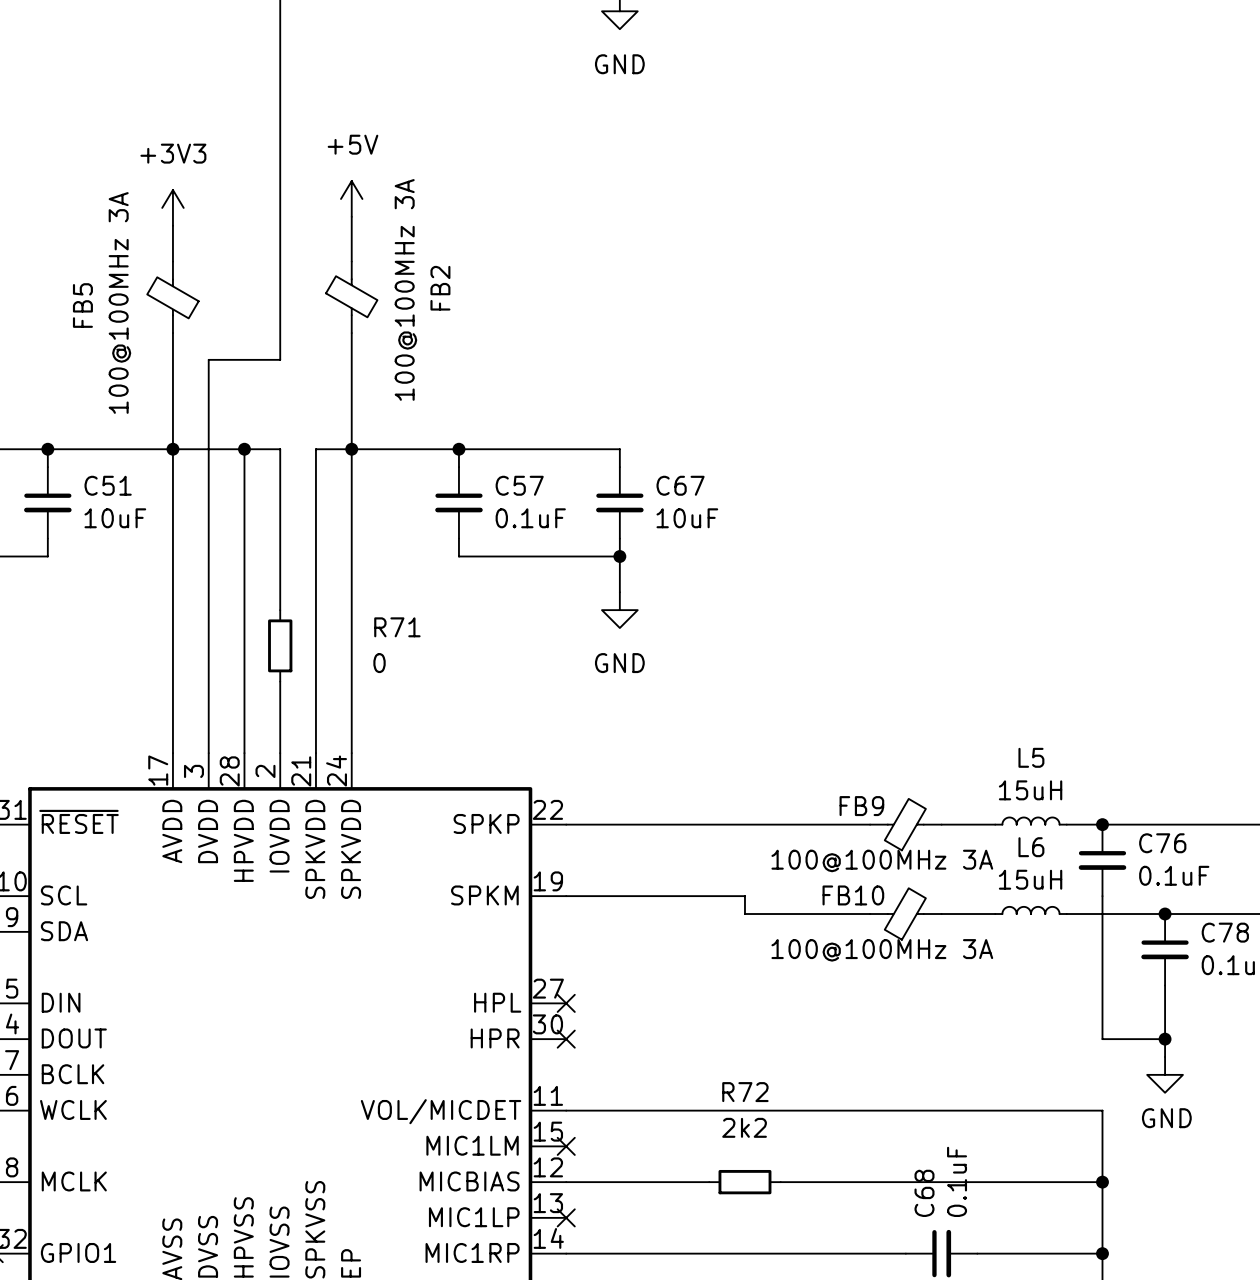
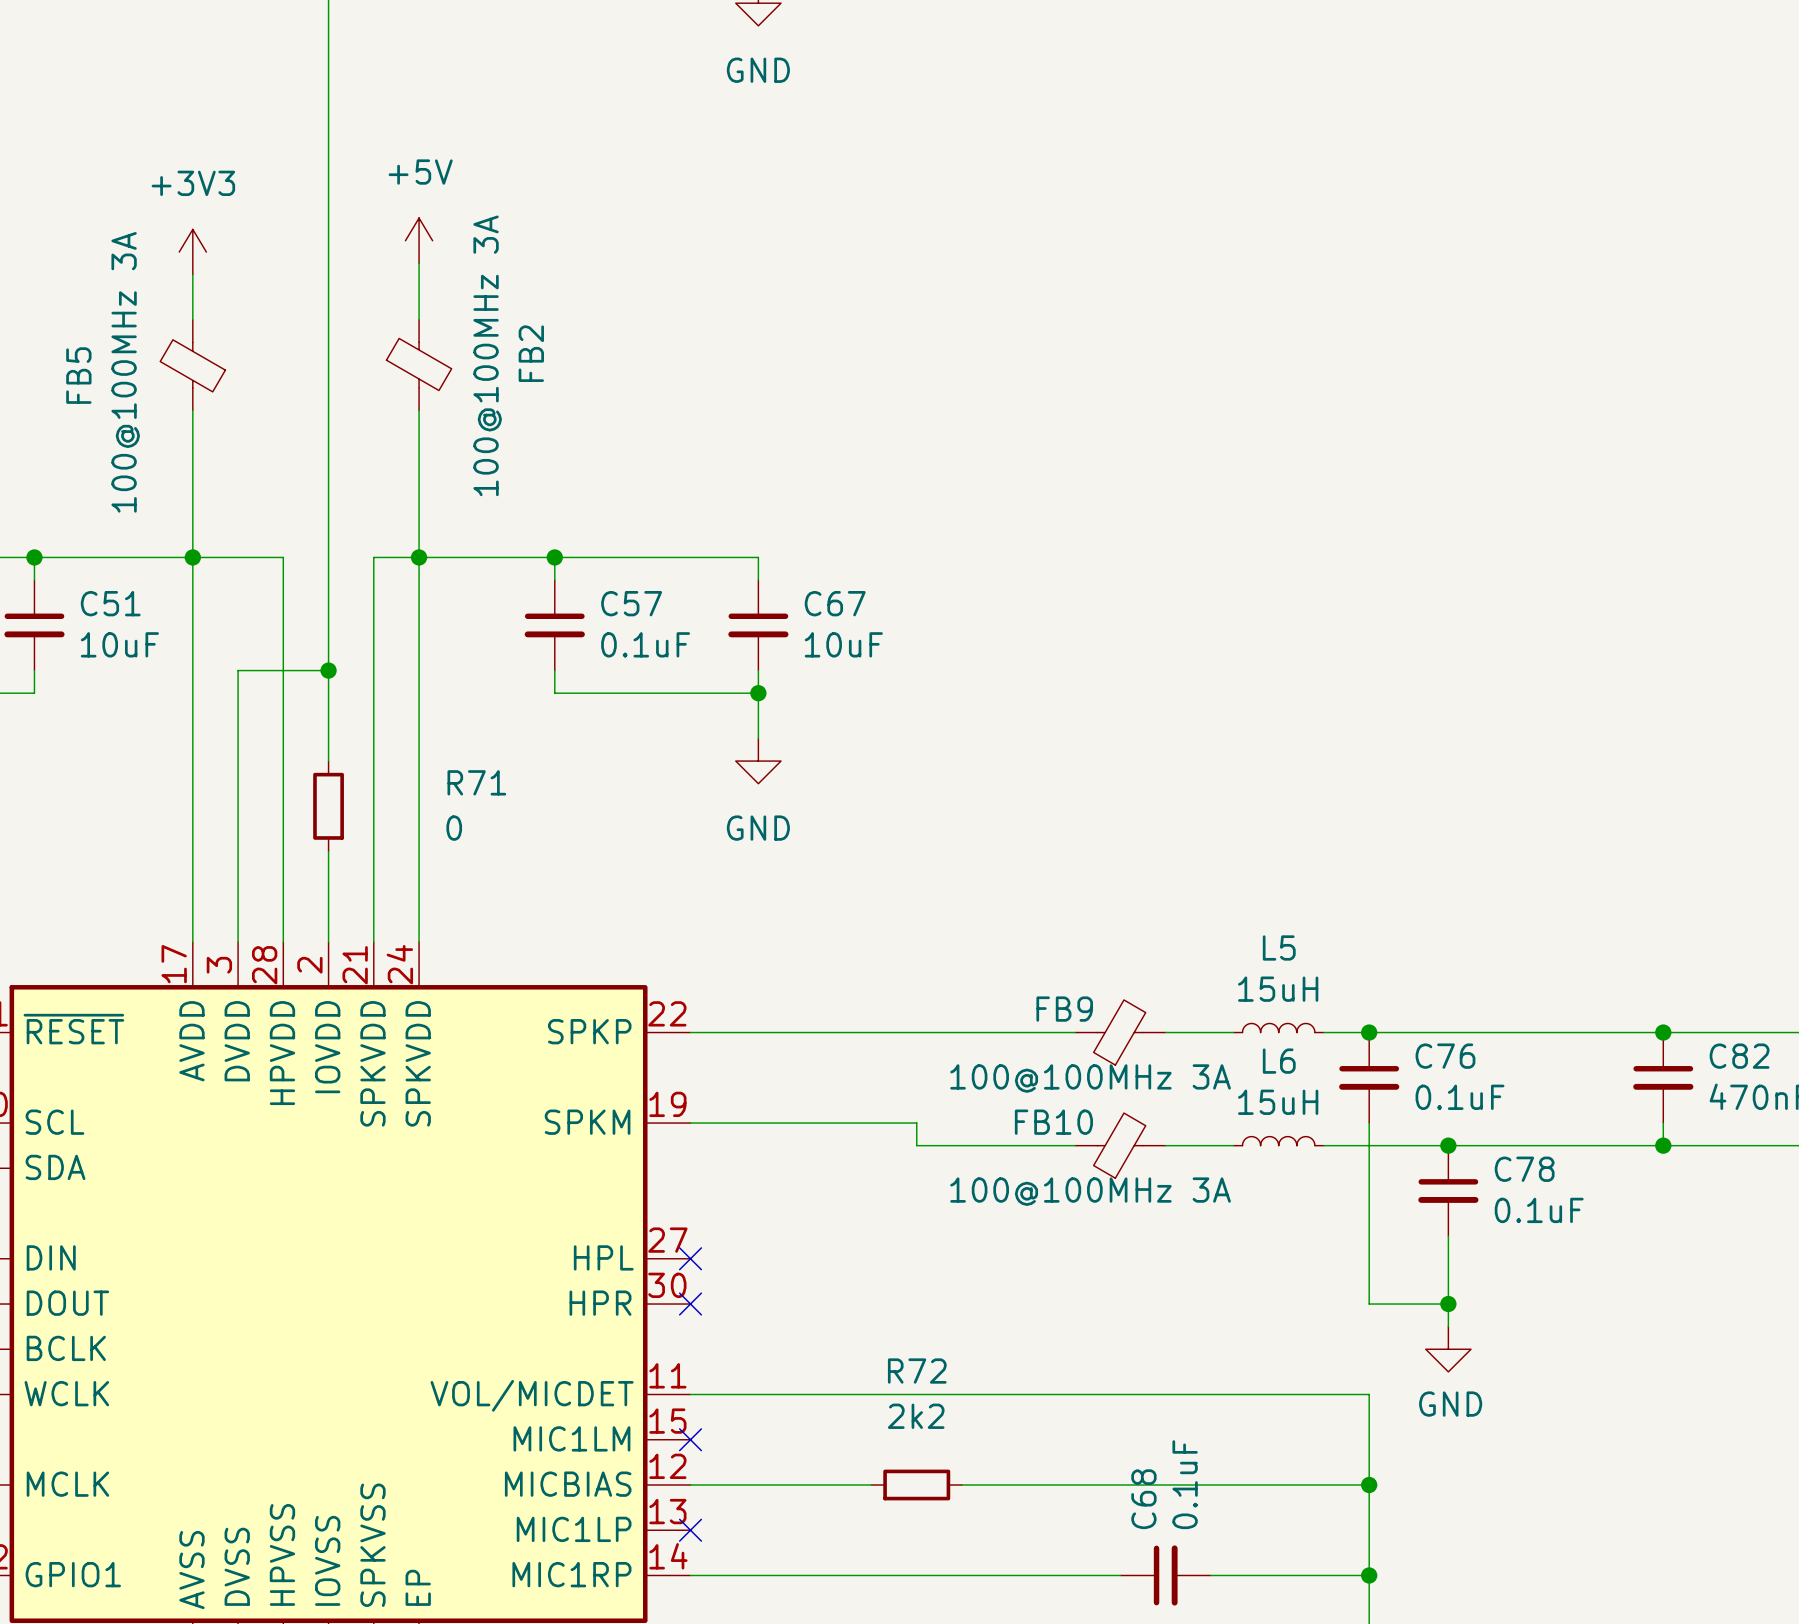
wire: (280, 359) (208, 359) (208, 538) -> (328, 670) (238, 670)
wire: (244, 449) (280, 449) -> (328, 444) (328, 557)
junction: (244, 449) -> none
junction: none -> (328, 670)

